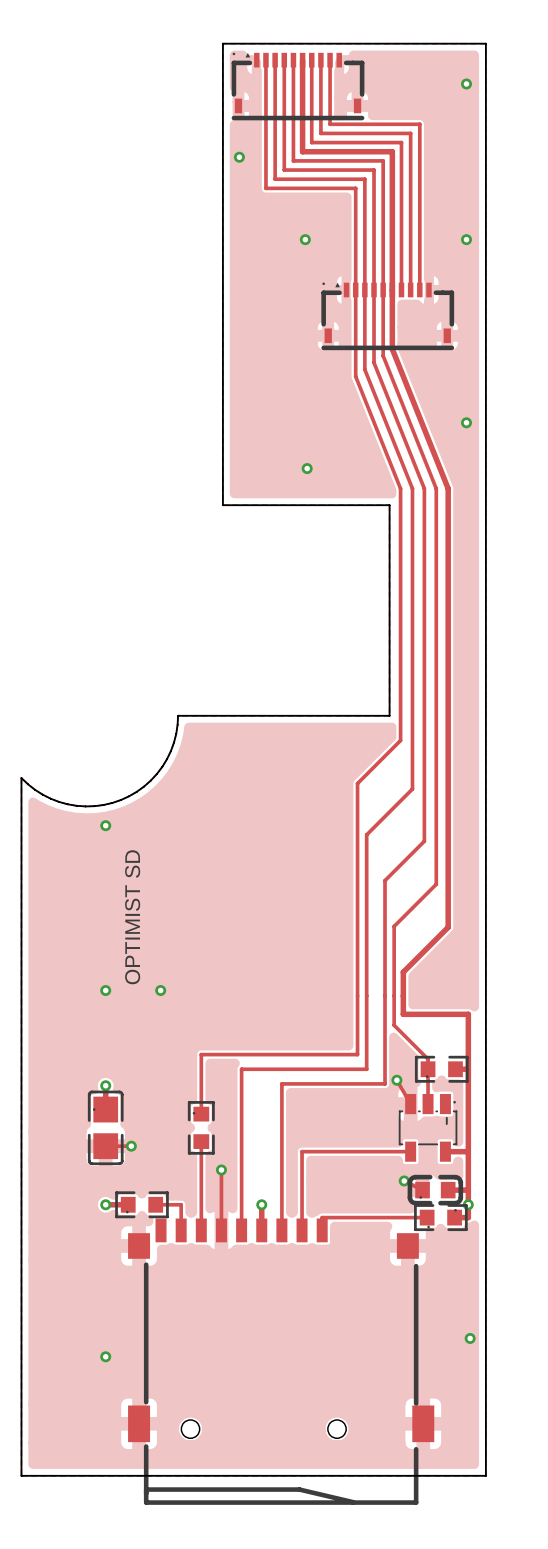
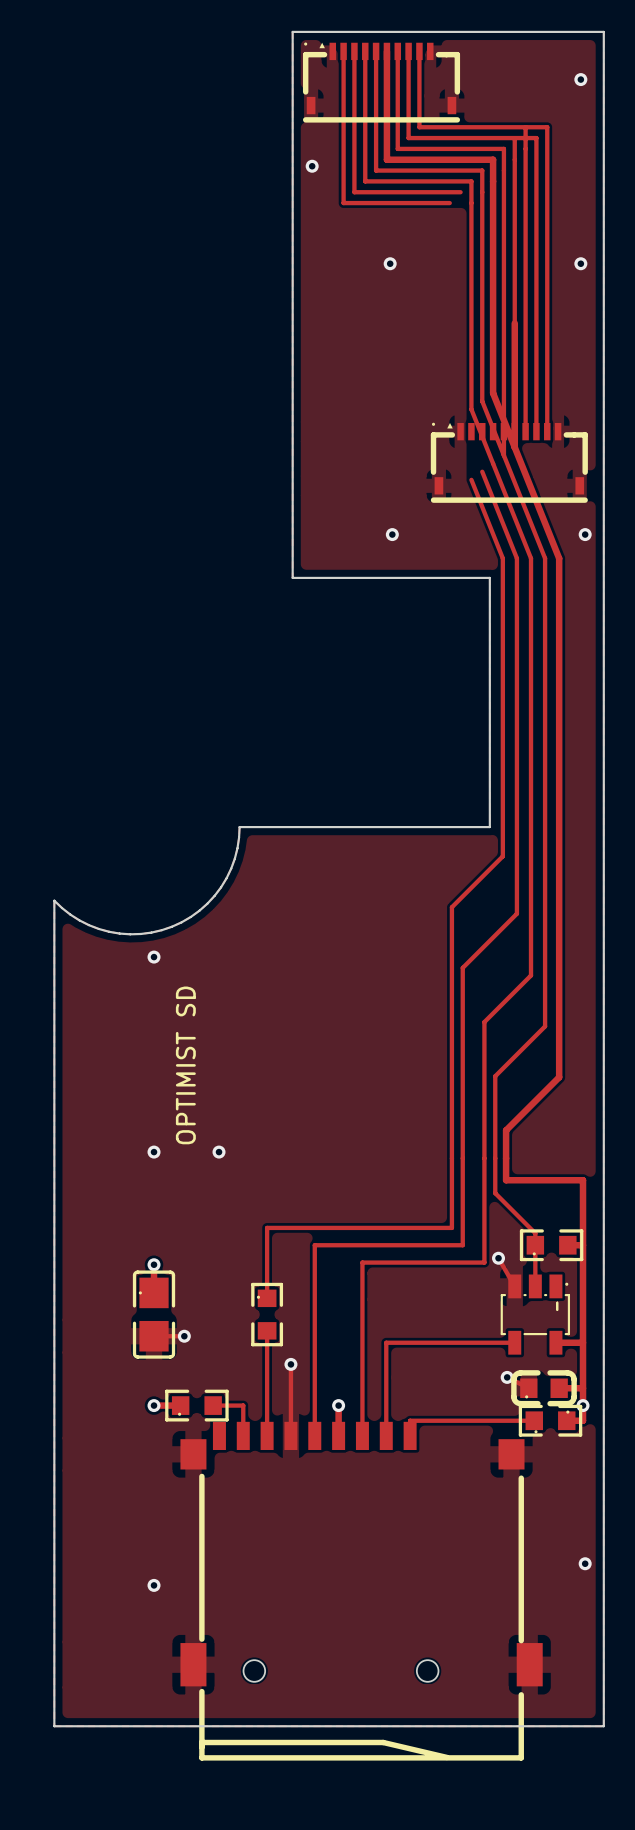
track: none -> (525, 127) (547, 127) (547, 431)
track: none -> (514, 138) (536, 138) (536, 431)
track: (364, 179) (364, 369) (383, 415) -> none
track: (355, 188) (355, 376) (374, 422) -> none
track: none -> (503, 323) (503, 455)
track: none -> (514, 323) (514, 447)
track: none -> (525, 323) (525, 431)
part position: (387, 316) -> (509, 462)
via position: (466, 422) -> (585, 534)

